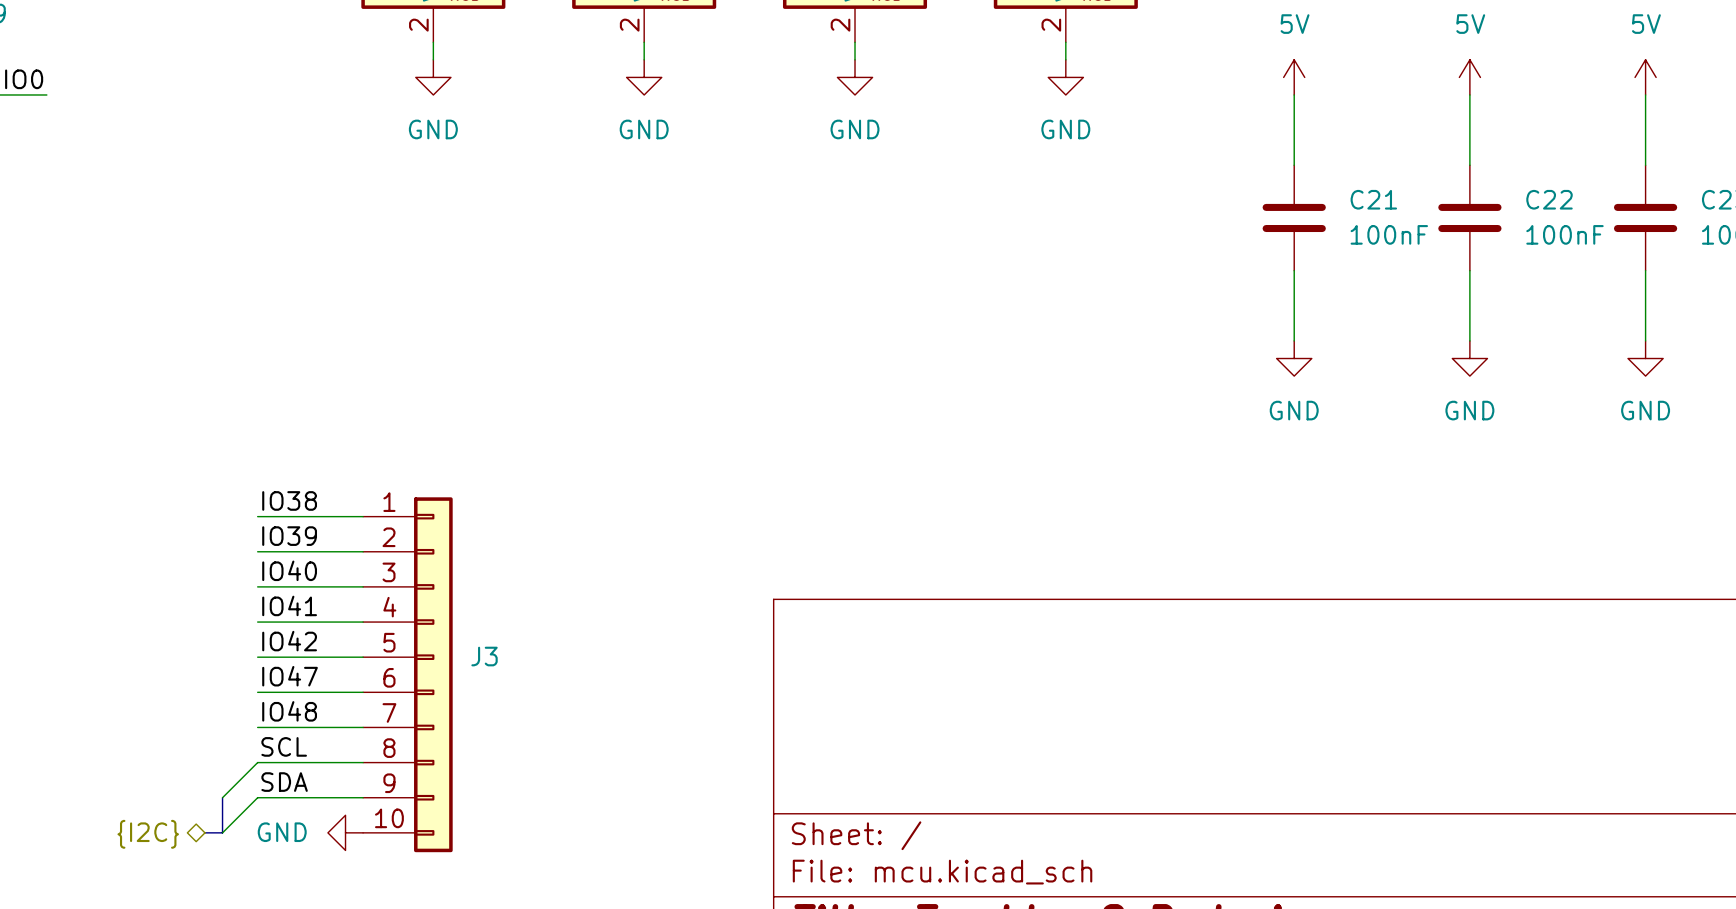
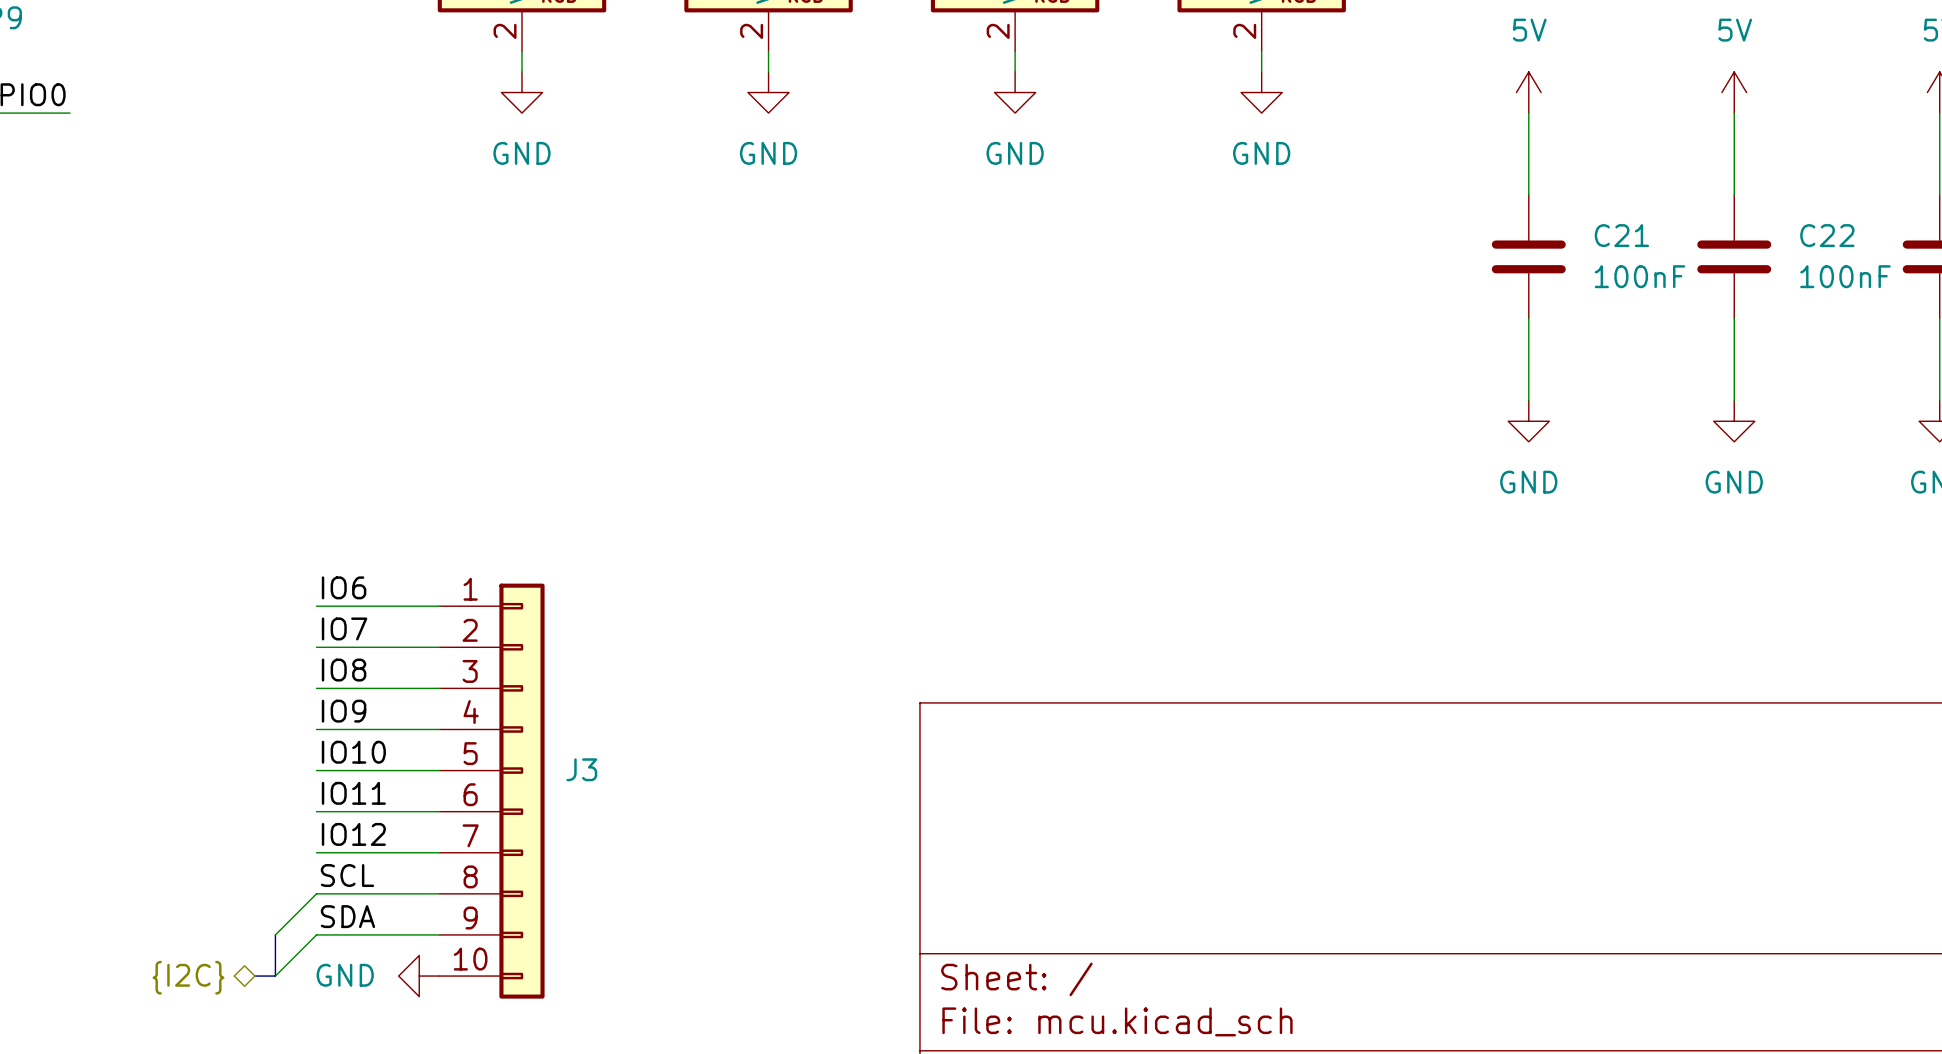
label: IO38 (289, 500) -> IO6 (344, 587)
label: IO39 (289, 536) -> IO7 (344, 628)
label: IO40 (289, 570) -> IO8 (344, 670)
label: IO41 (289, 605) -> IO9 (344, 711)
label: IO42 (289, 641) -> IO10 (353, 752)
label: IO47 (290, 676) -> IO11 (353, 793)
label: IO48 (289, 711) -> IO12 (353, 834)

